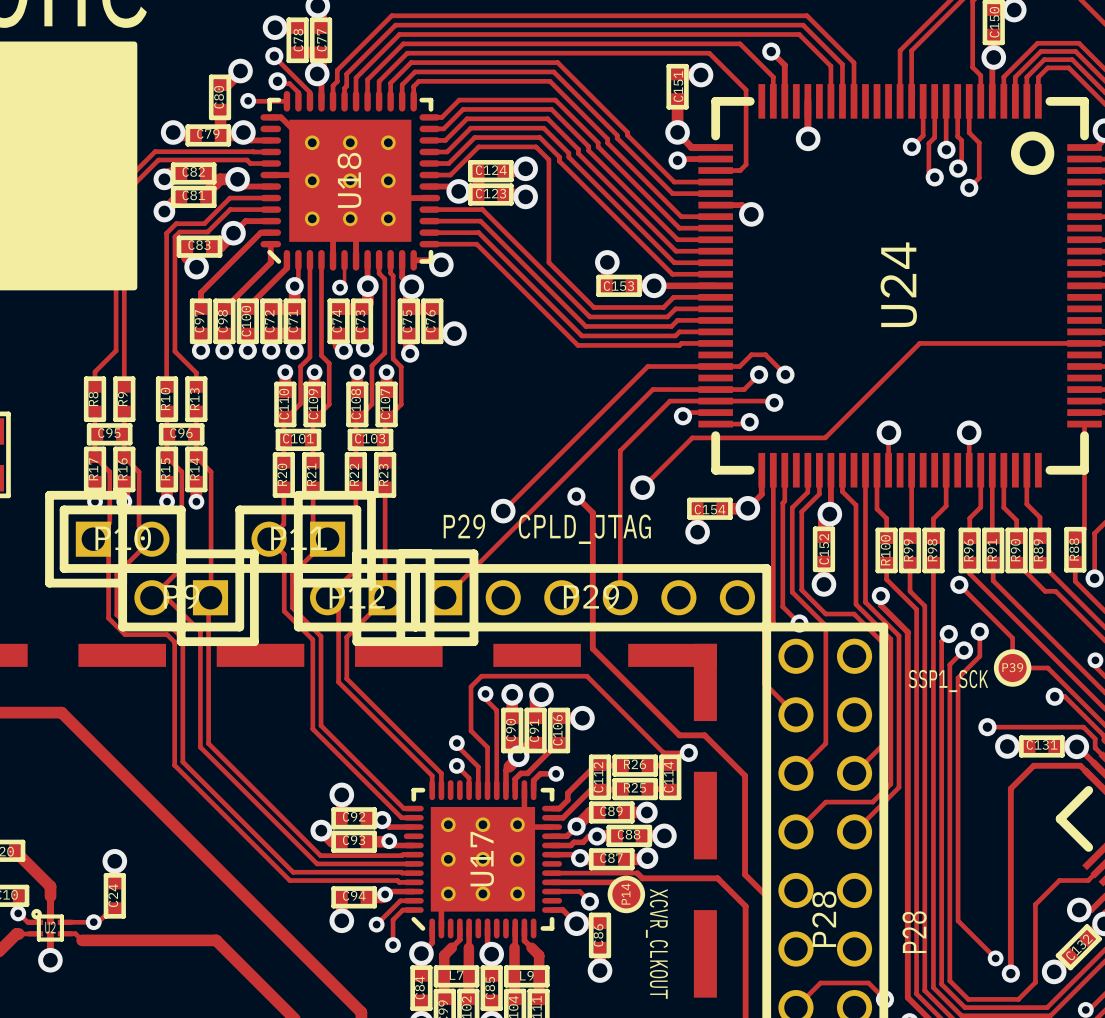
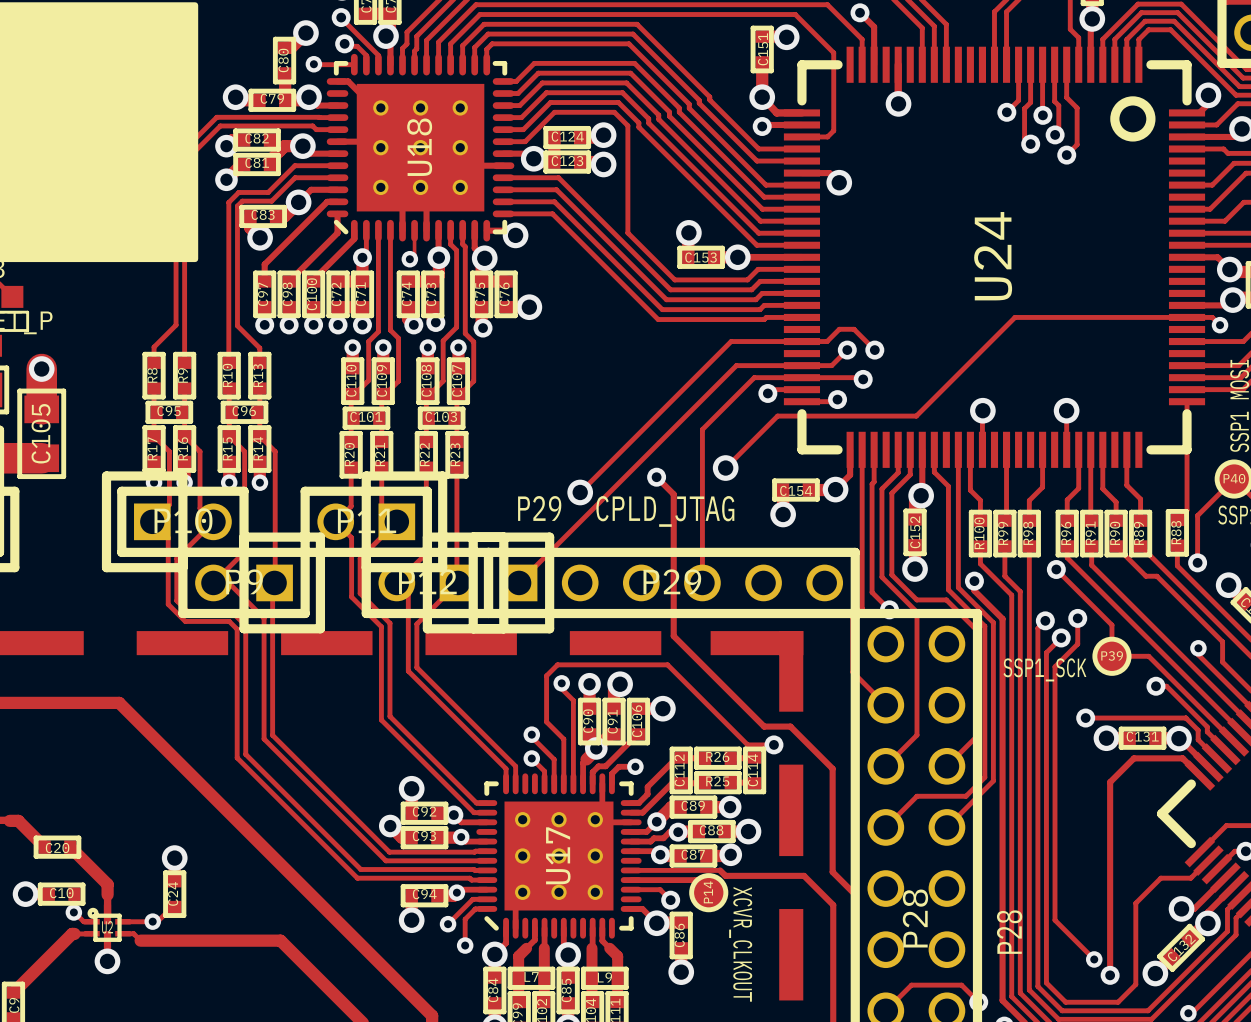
U17 footprint: [403, 780, 563, 939] -> [476, 773, 642, 939]

